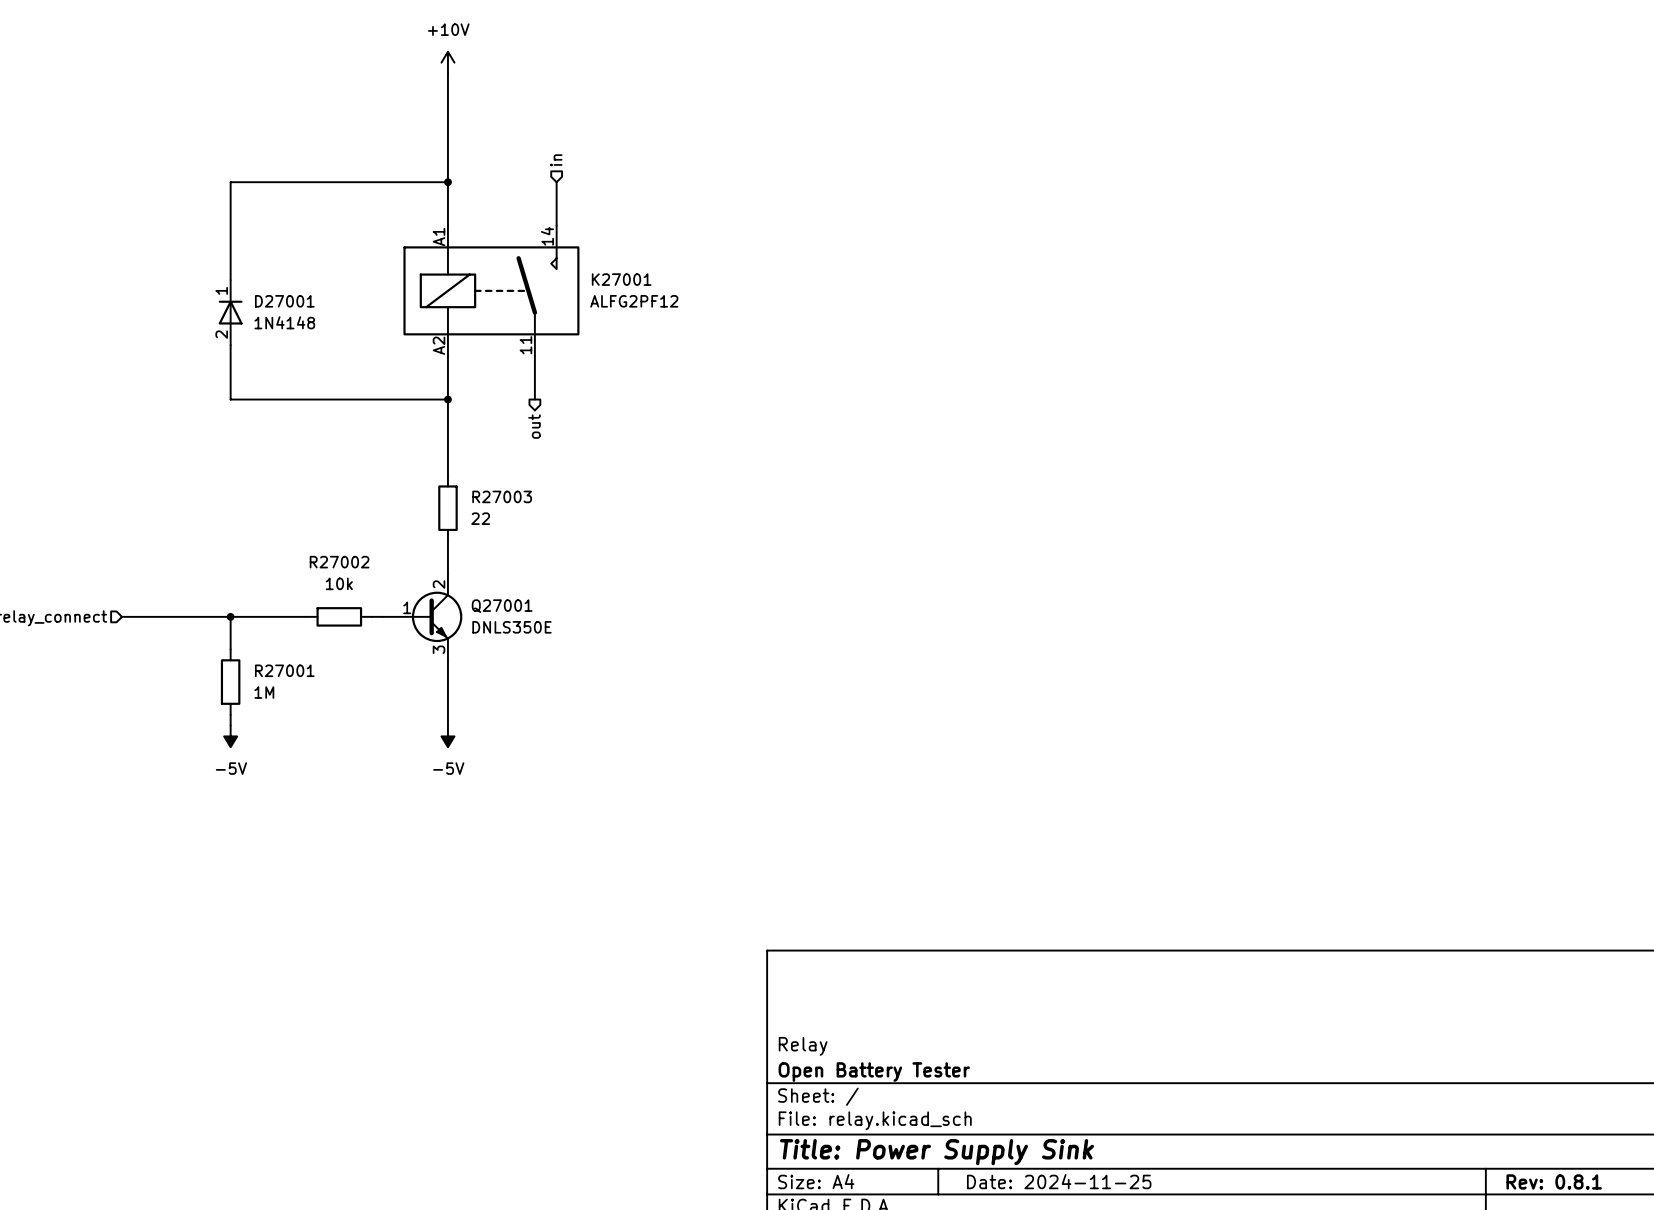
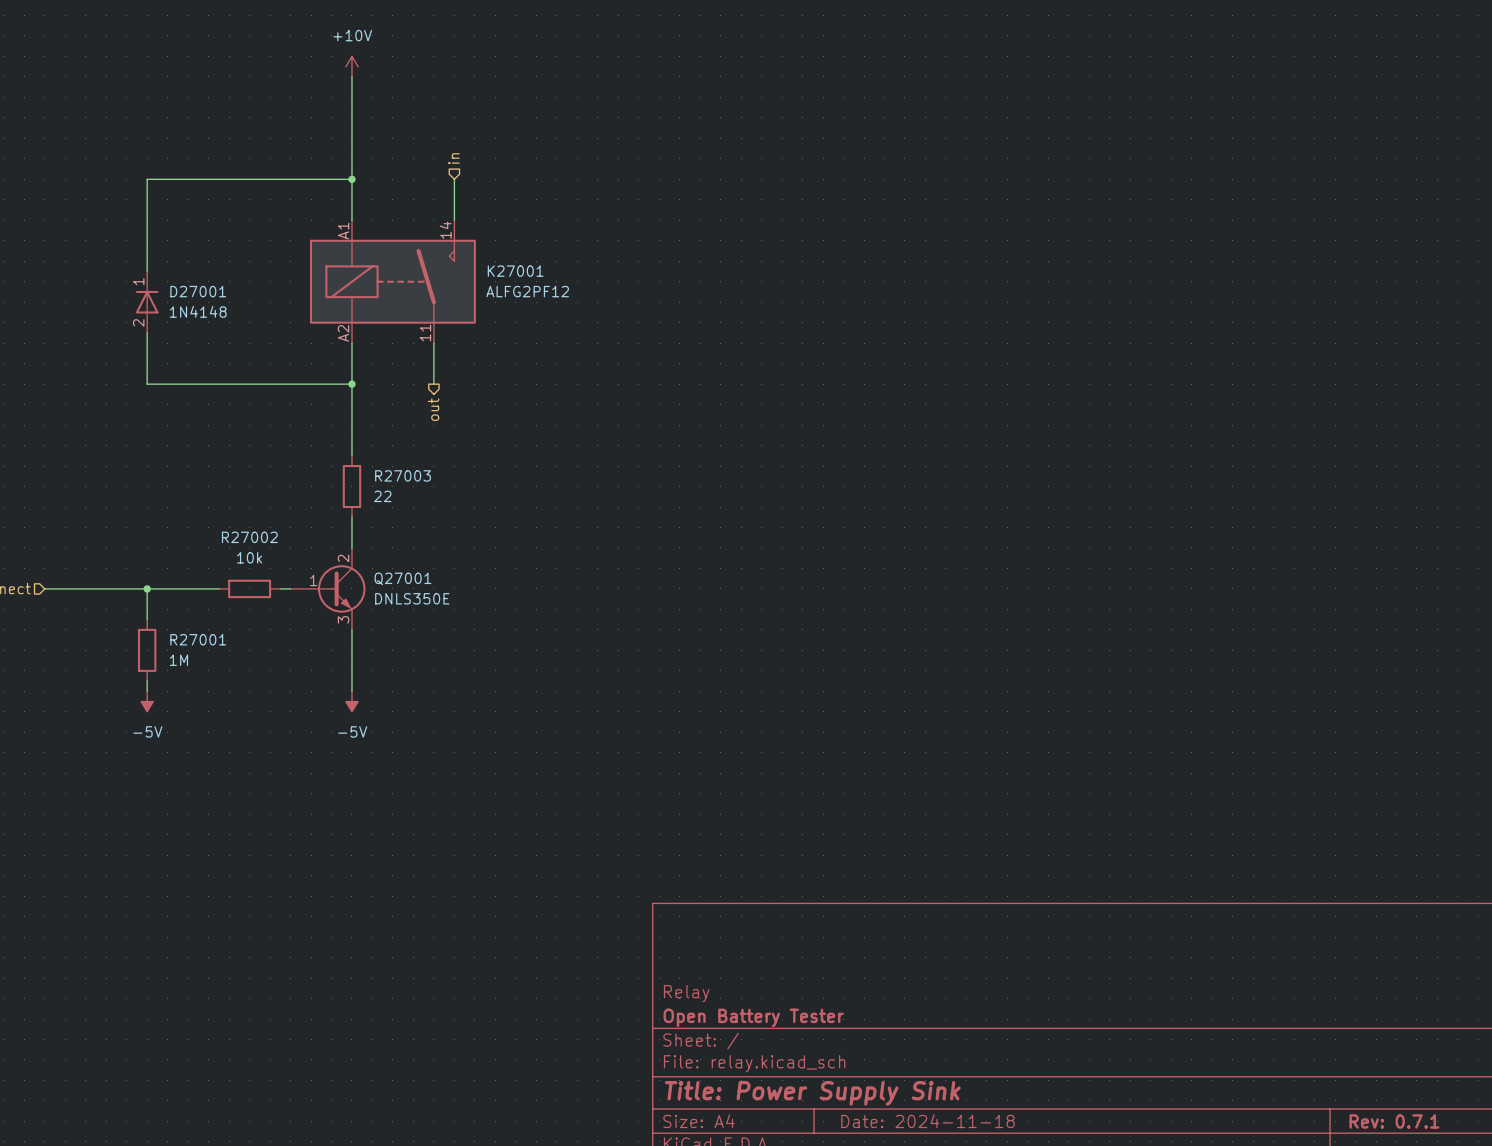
title block: Date: 2024-11-25 (1059, 1181) -> Date: 2024-11-18 (927, 1121)
title block: Rev: 0.8.1 (1554, 1181) -> Rev: 0.7.1 (1394, 1121)

